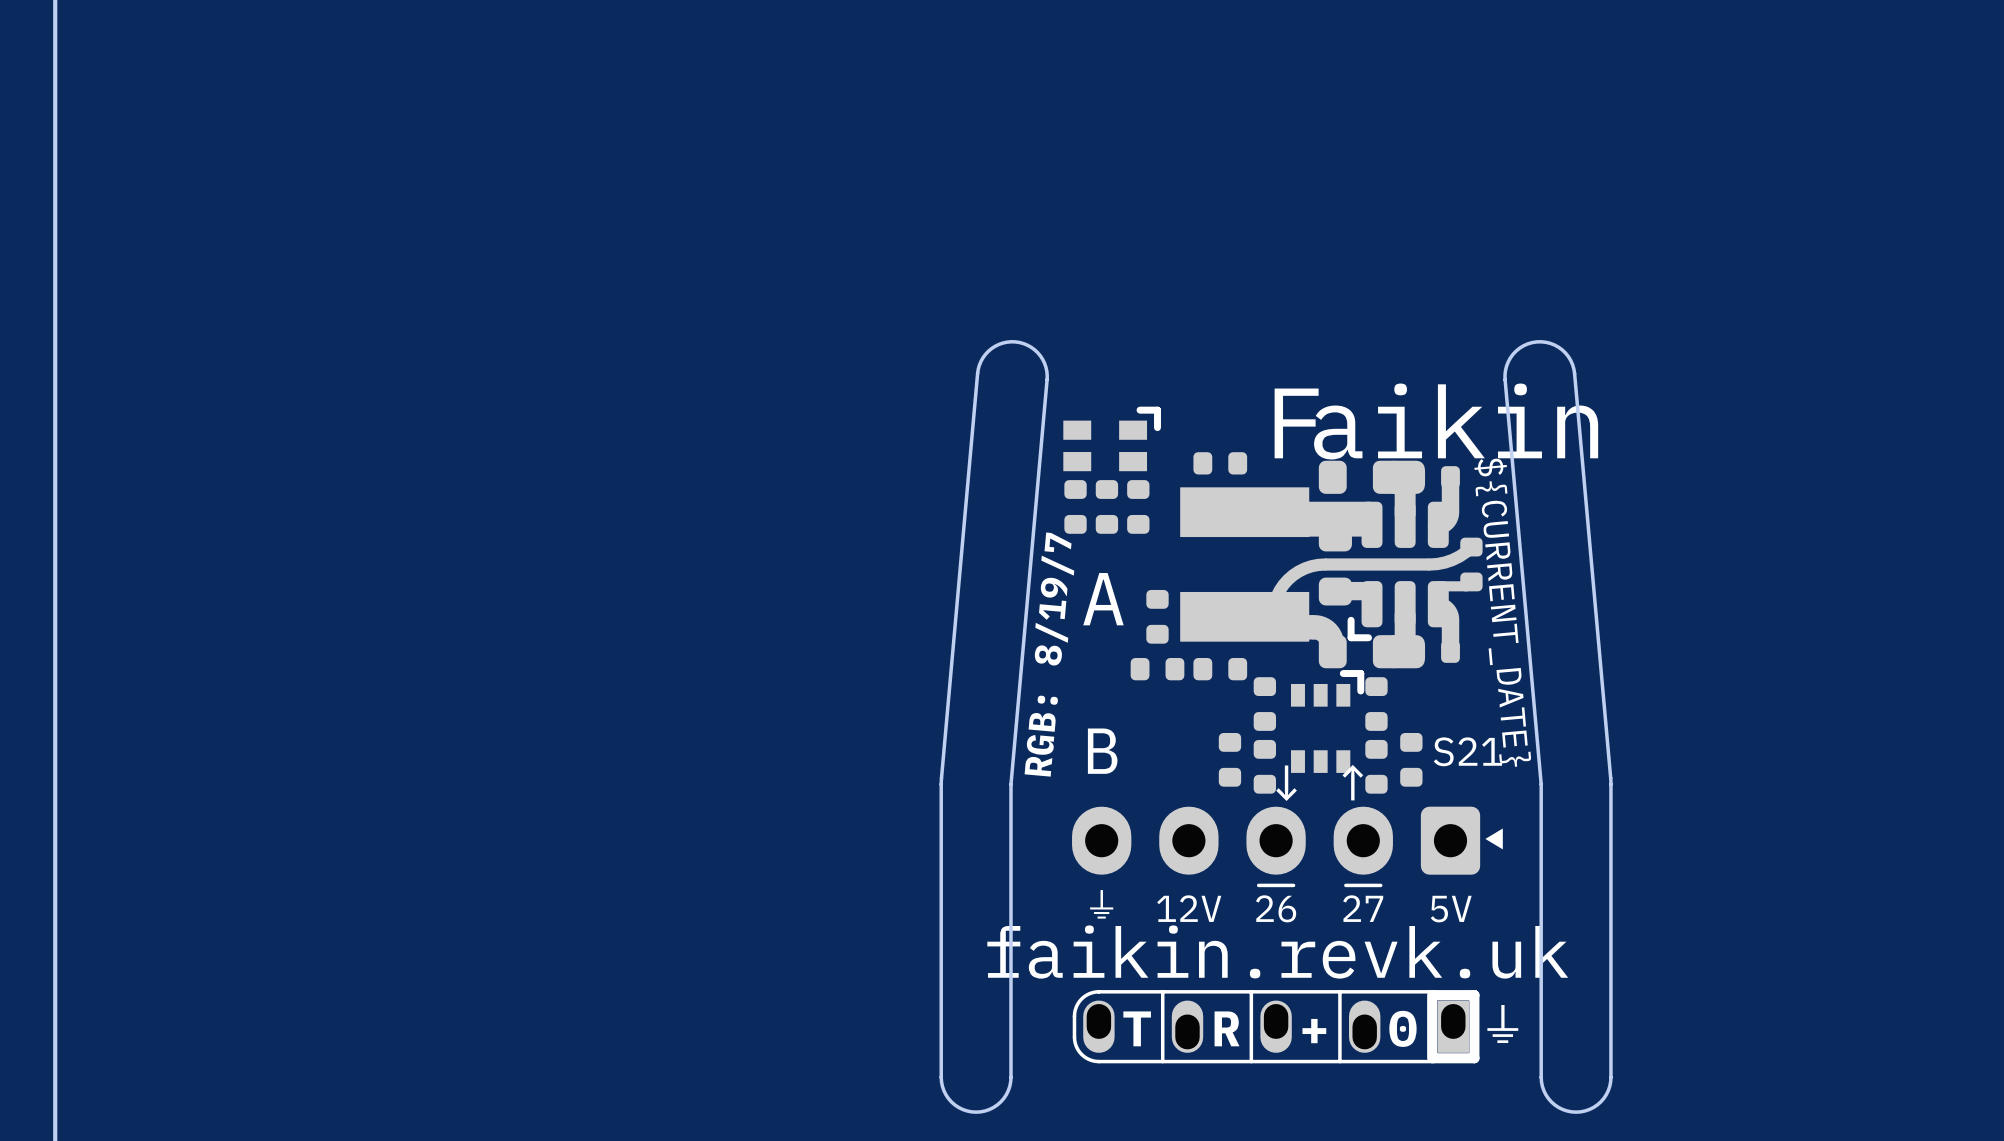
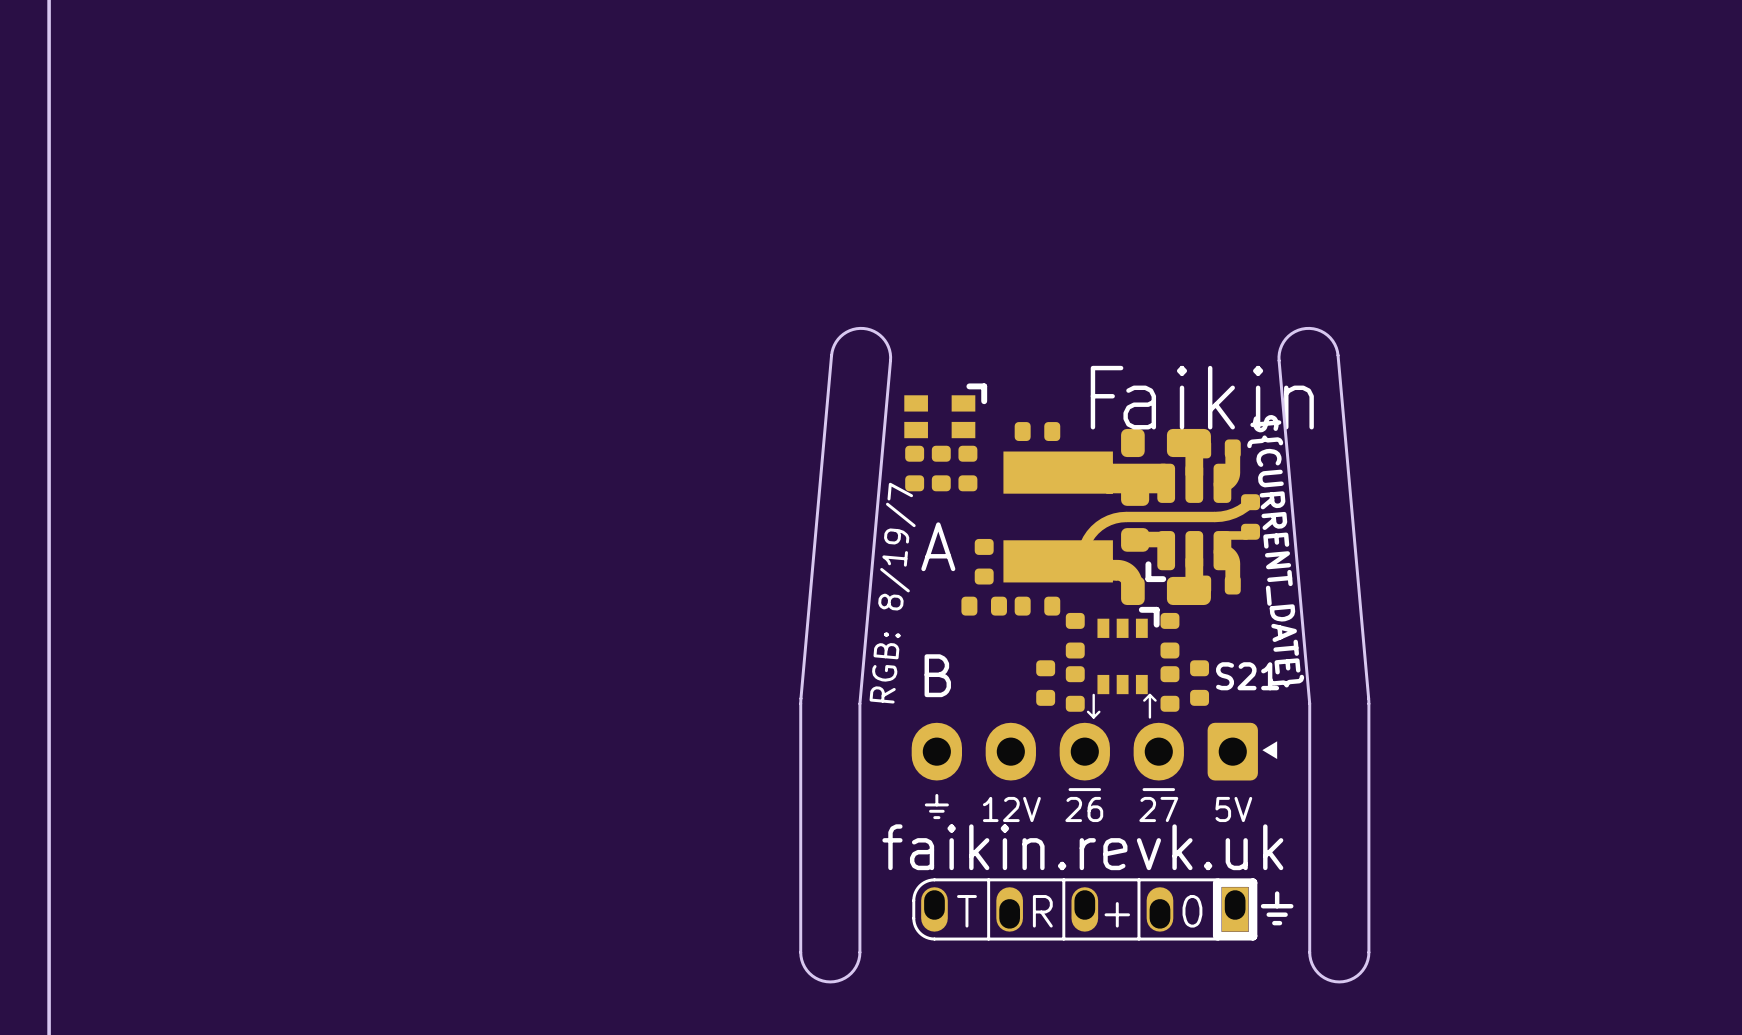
part footprint: [1180, 460, 1483, 669] -> [1003, 428, 1260, 606]

